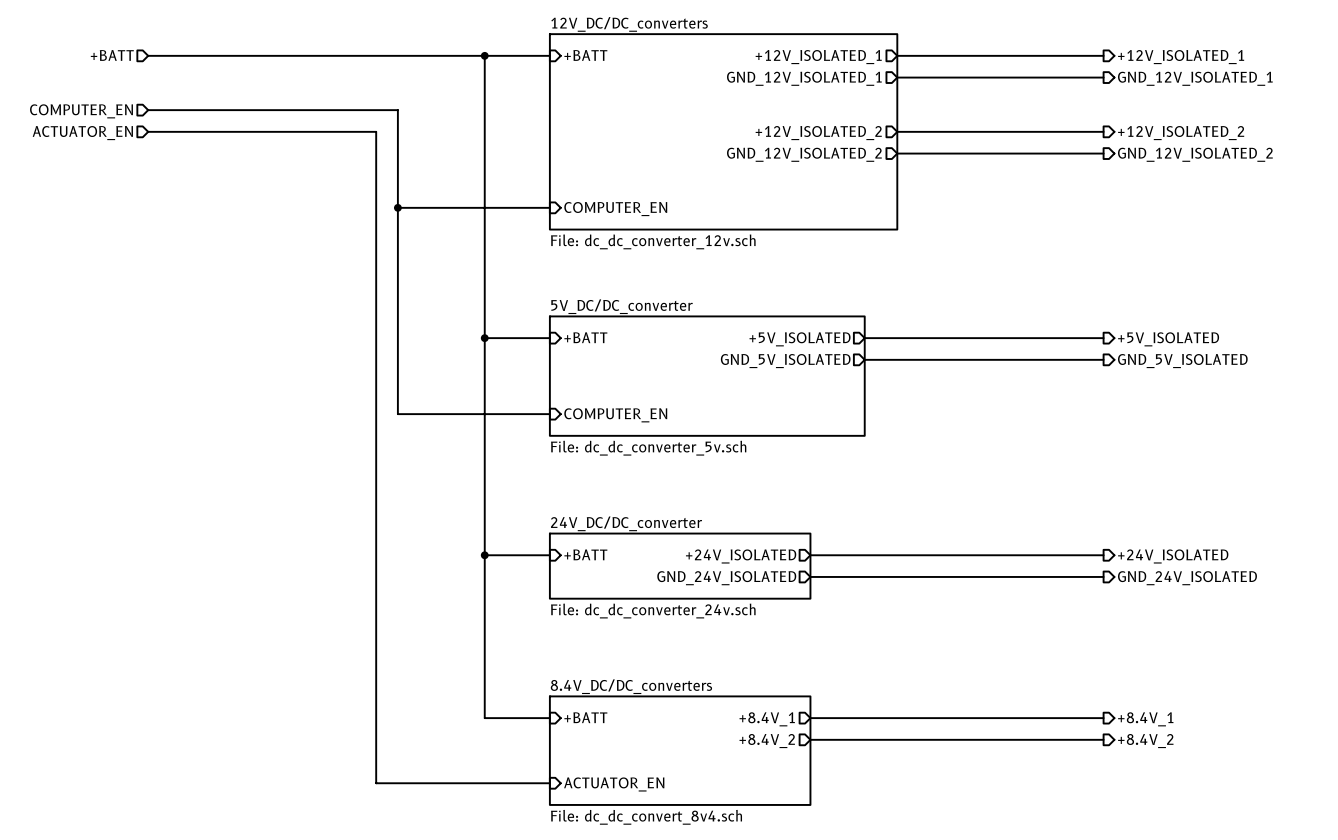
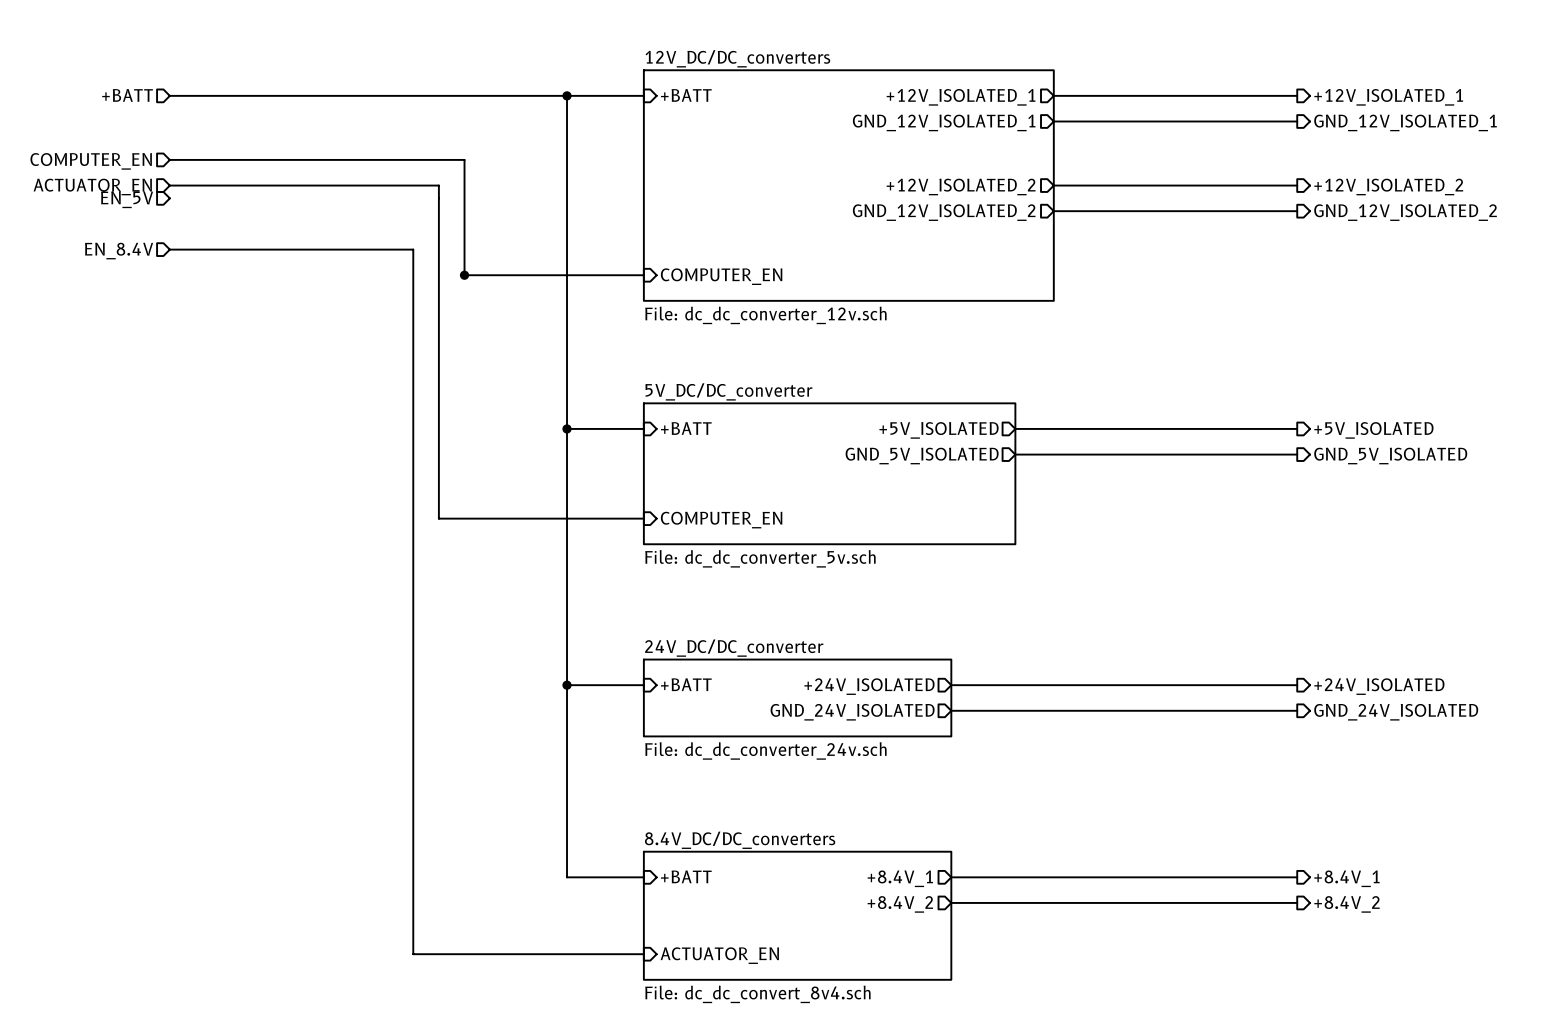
hierarchical label: none -> EN_5V (127, 199)
hierarchical label: none -> EN_8.4V (119, 251)
wire: (397, 207) (397, 414) -> (438, 518) (464, 518)
wire: (376, 414) (376, 783) -> (169, 249) (413, 249) (413, 954) (438, 954)

